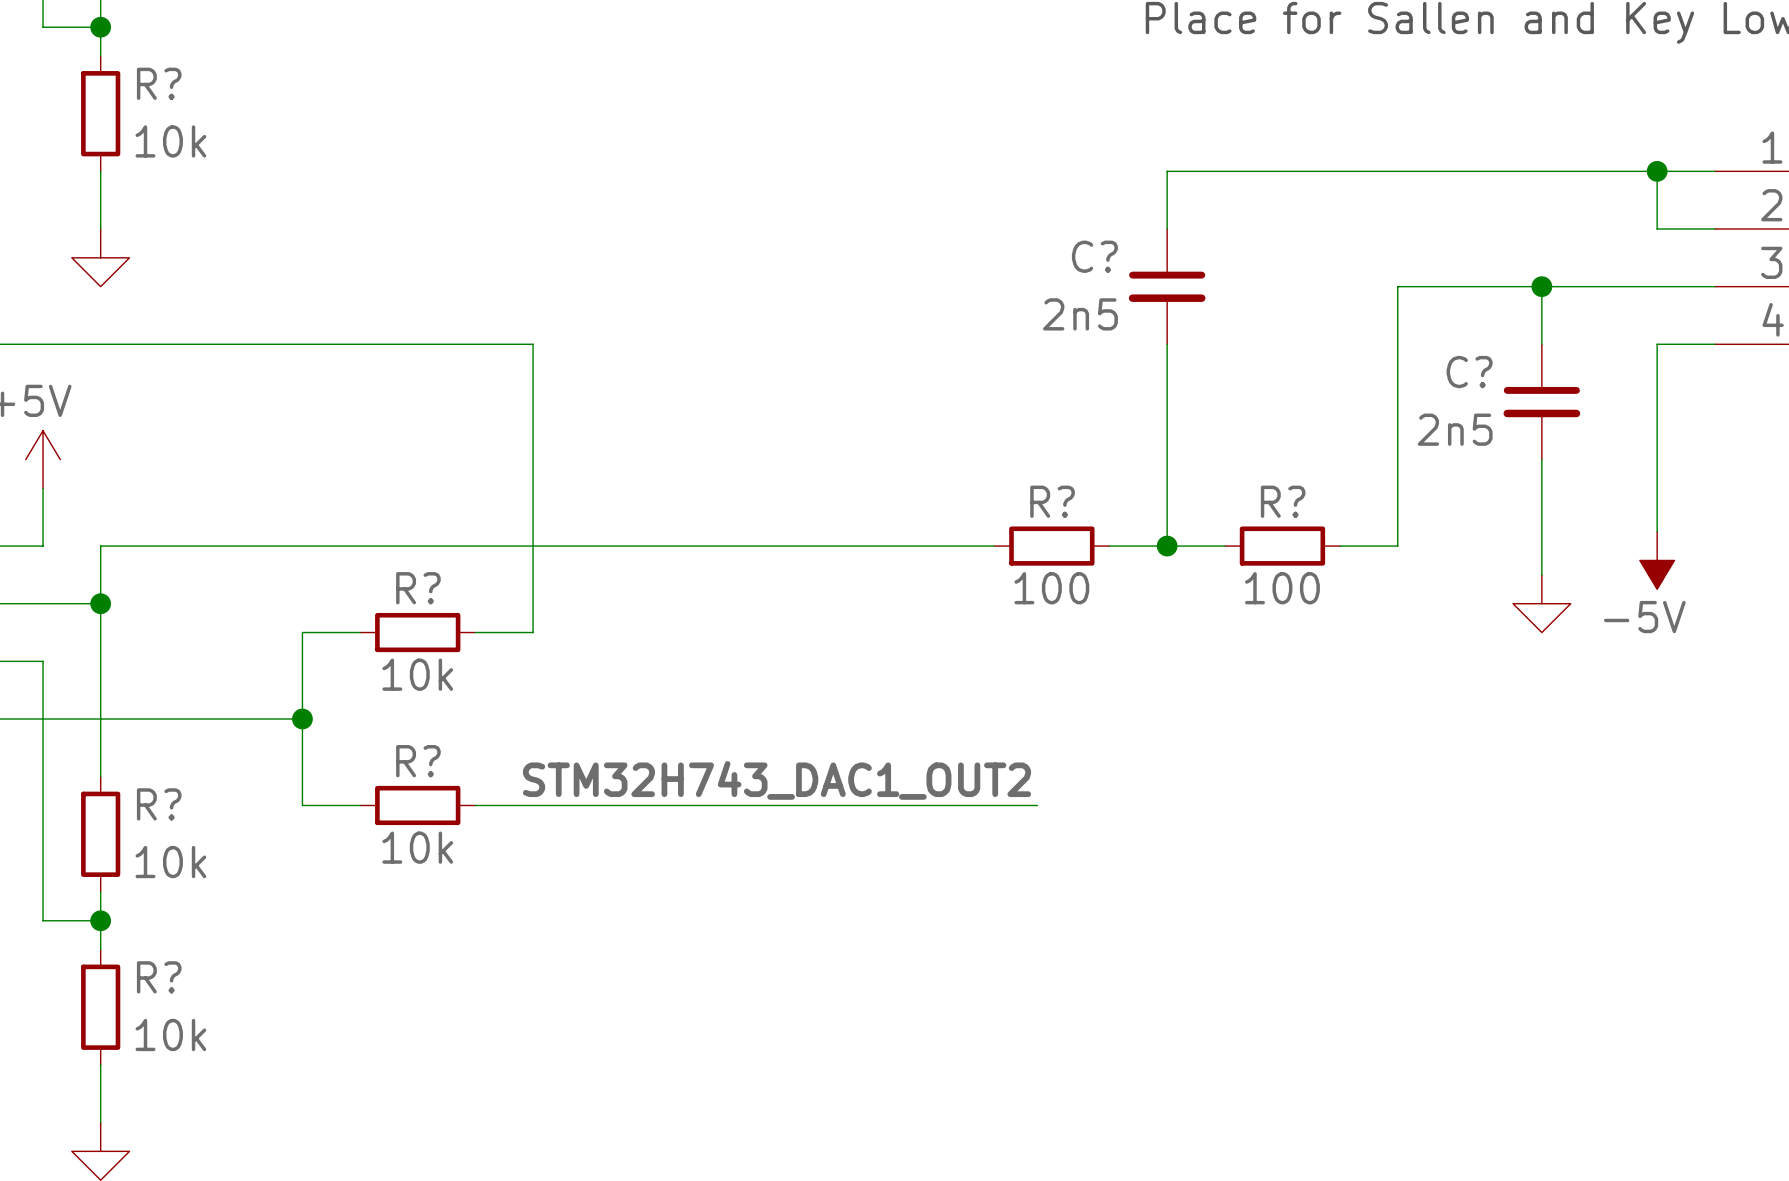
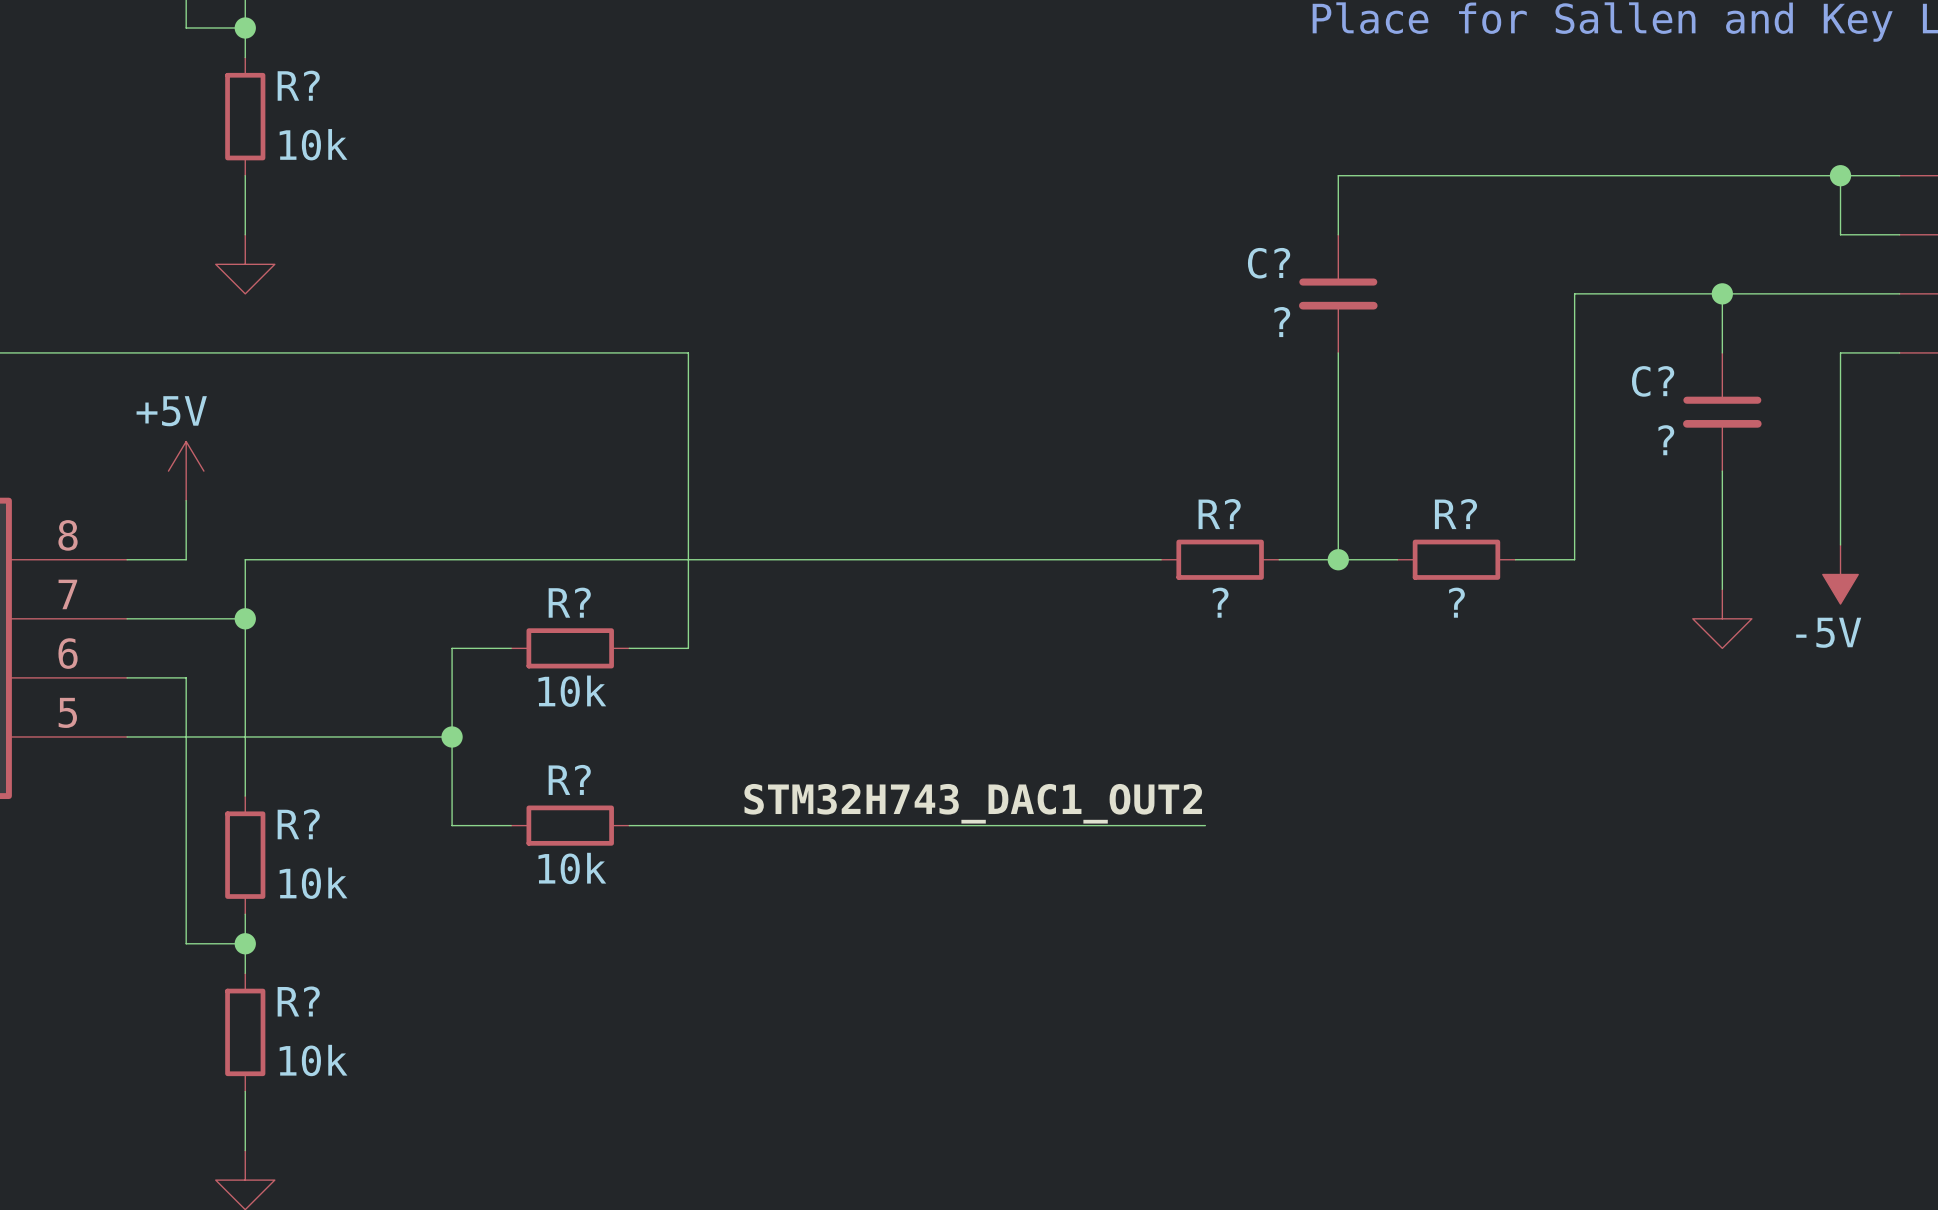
C? value: 2n5 (1080, 314) -> ? (1282, 322)
C? value: 2n5 (1455, 429) -> ? (1666, 440)
R? value: 100 (1051, 588) -> ? (1220, 602)
R? value: 100 (1282, 588) -> ? (1456, 602)

